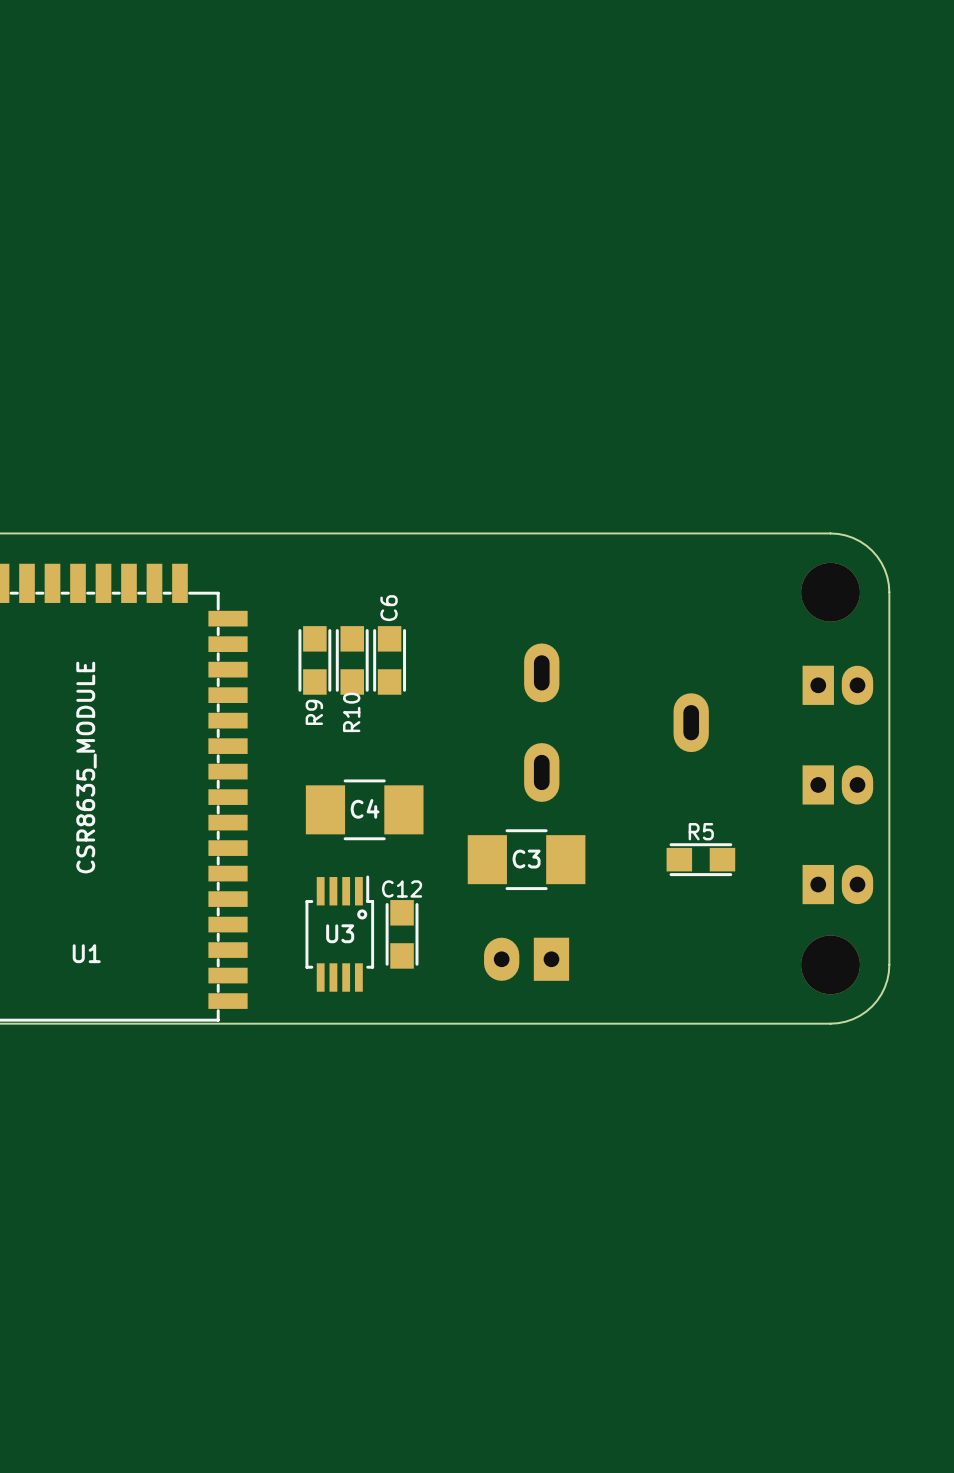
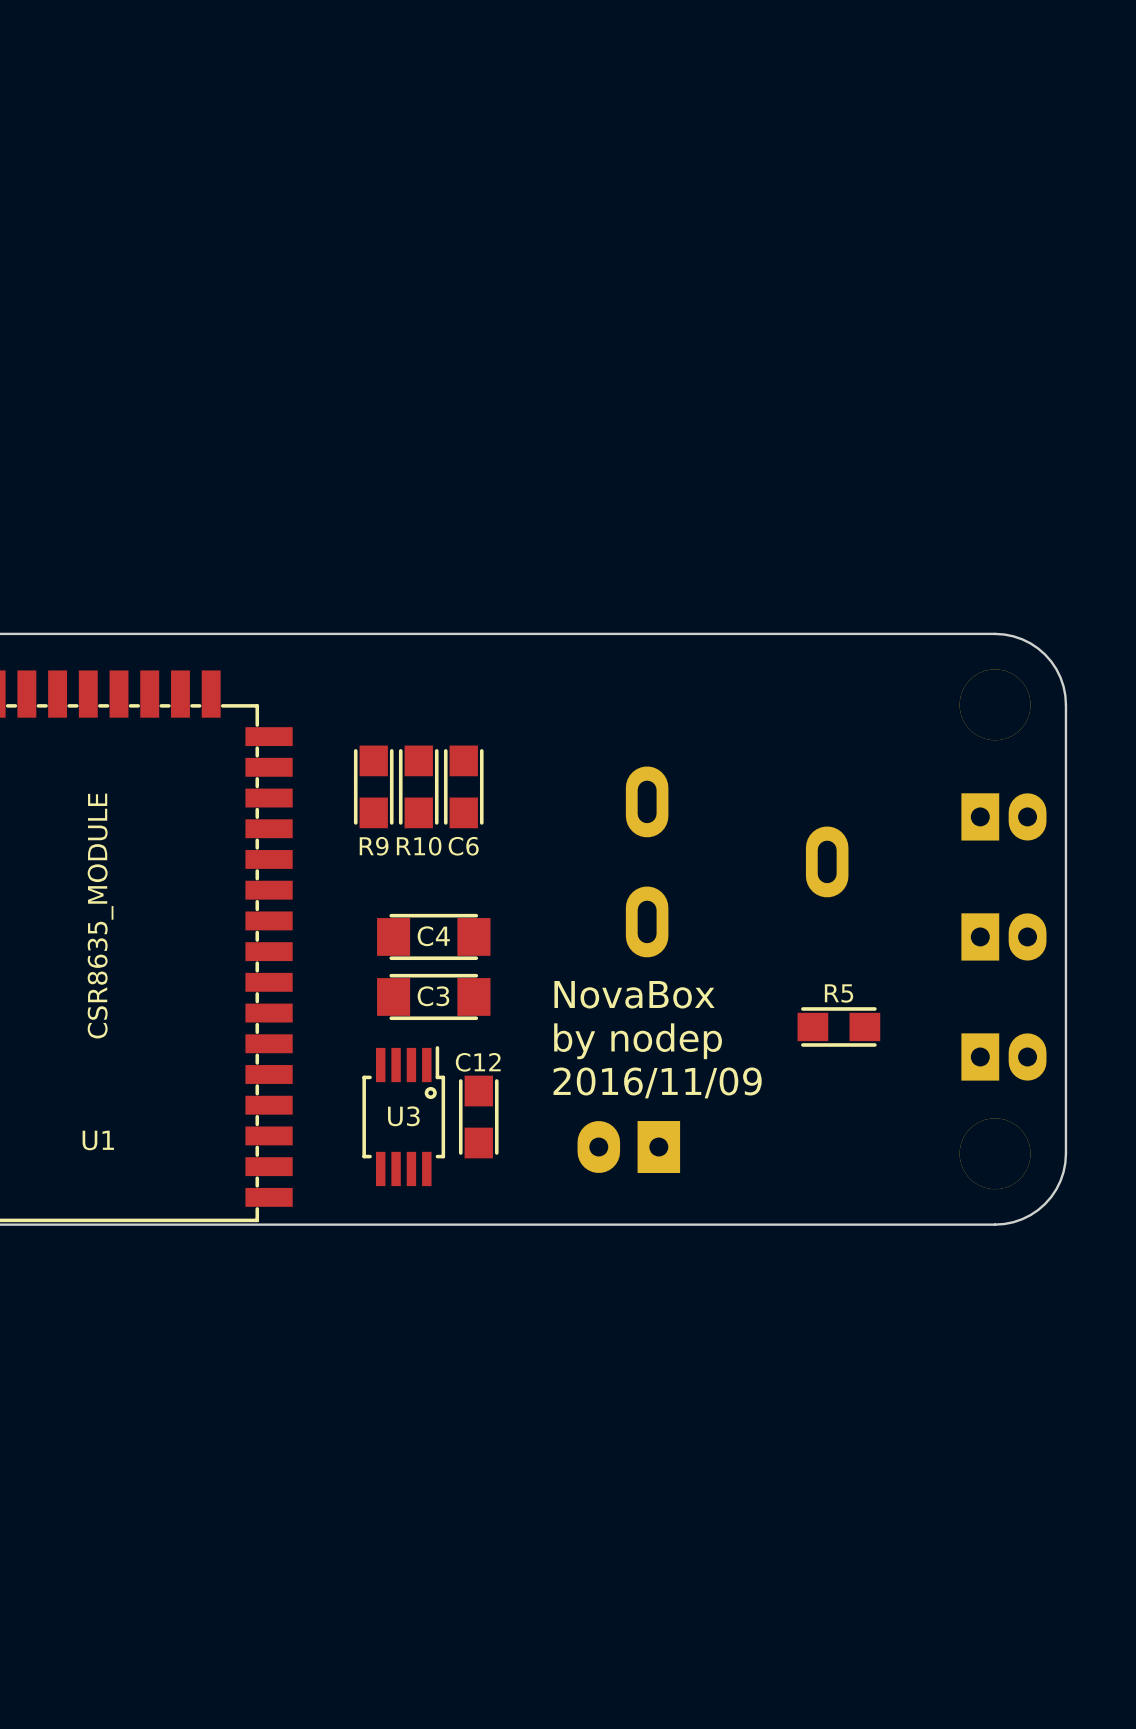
C6 name rotation: 0° (389, 608) -> 90° clockwise (463, 846)
C6 name position: C6 (389, 608) -> C6 (463, 846)
R9 name rotation: 0° (314, 712) -> 90° clockwise (374, 846)
R10 name rotation: 0° (351, 712) -> 90° clockwise (419, 846)
C4 footprint: [305, 779, 424, 841] -> [377, 913, 491, 961]
C3 footprint: [467, 829, 586, 891] -> [377, 973, 491, 1021]
text: none -> NovaBox (634, 994)
text: none -> by nodep (638, 1041)
text: none -> 2016/11/09 (657, 1082)

